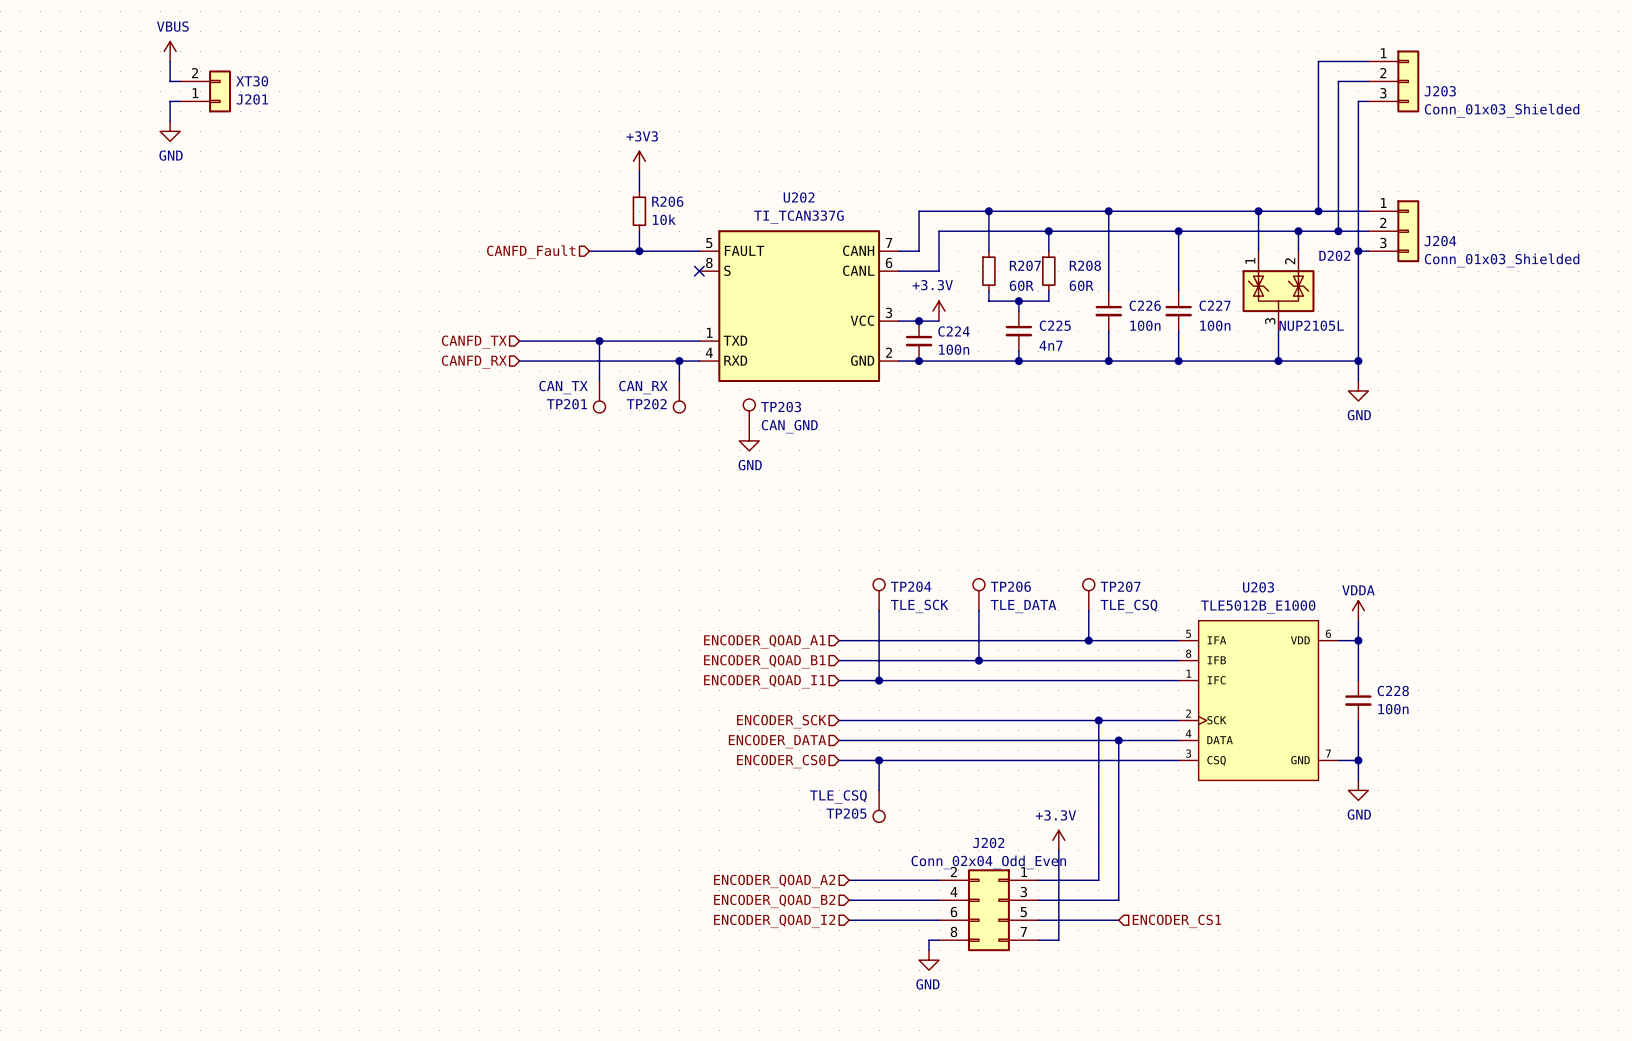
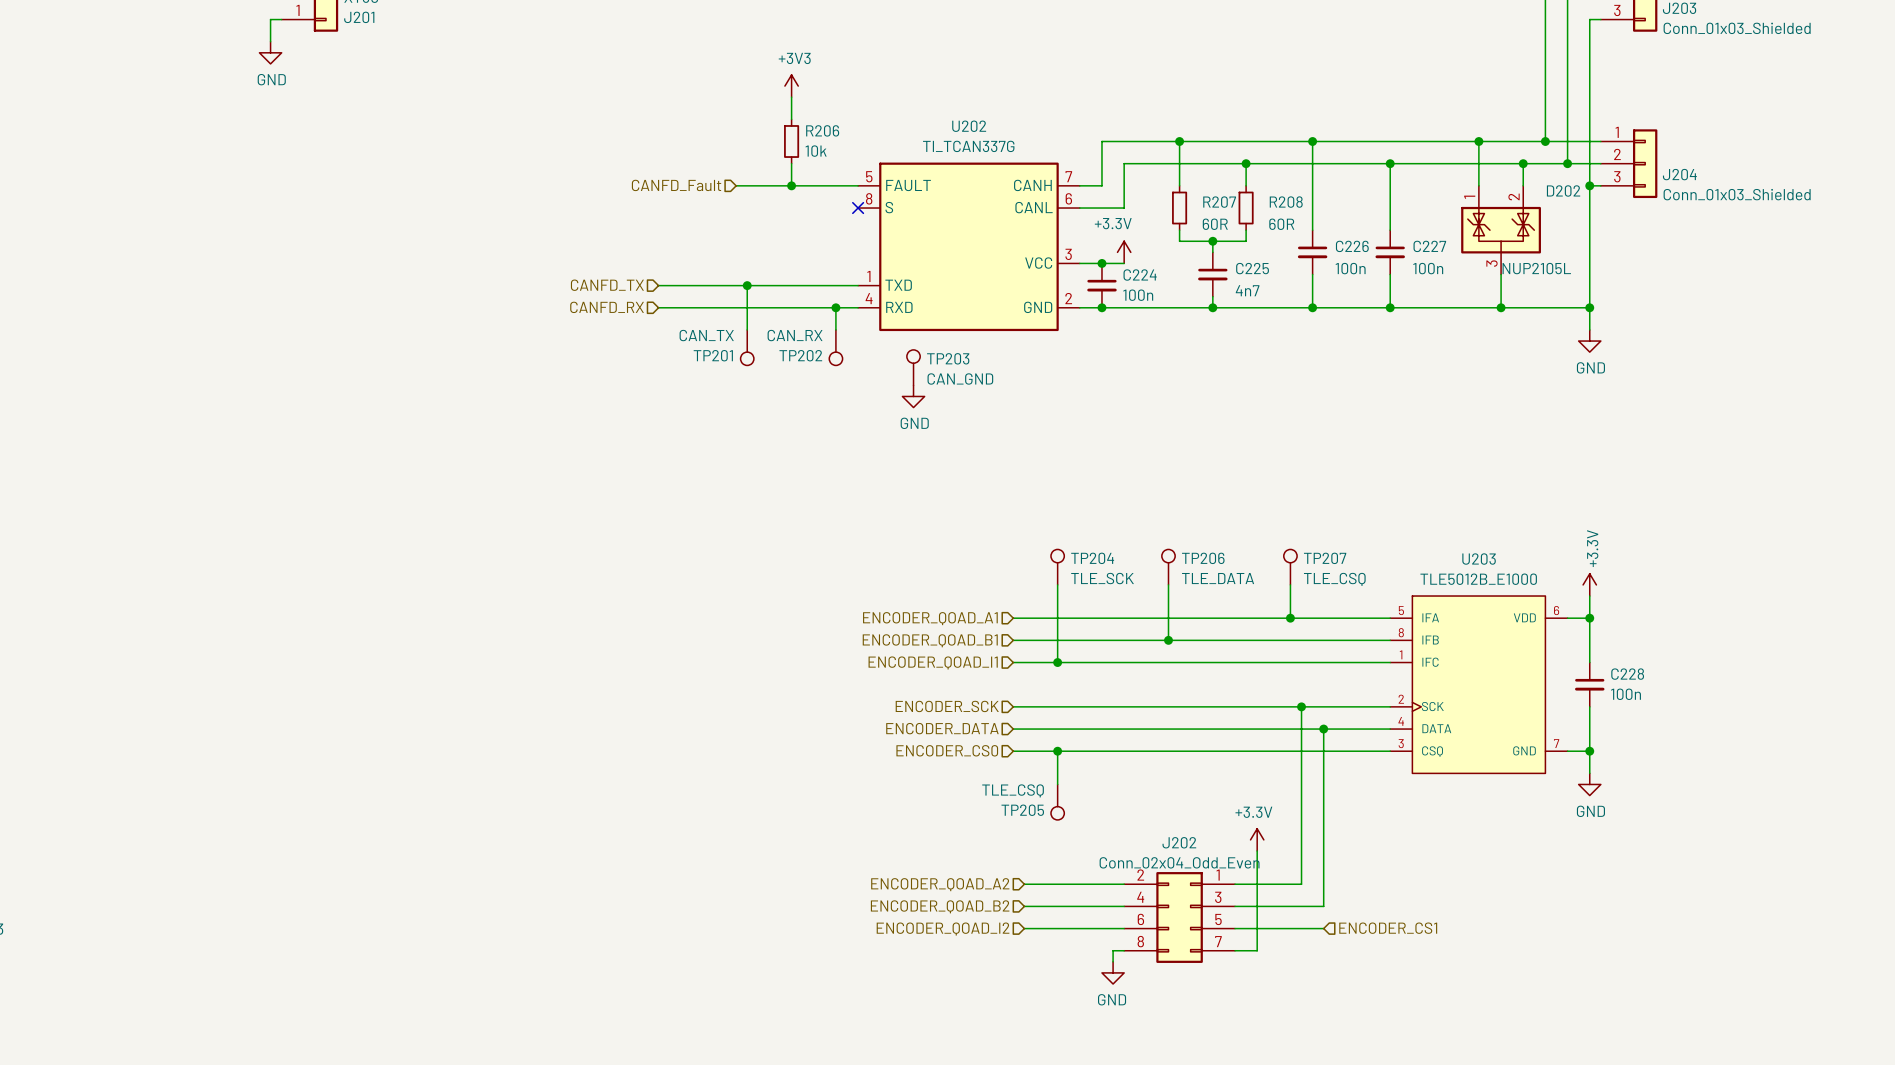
power symbol: VDDA (1358, 610) -> +3.3V (1589, 584)

